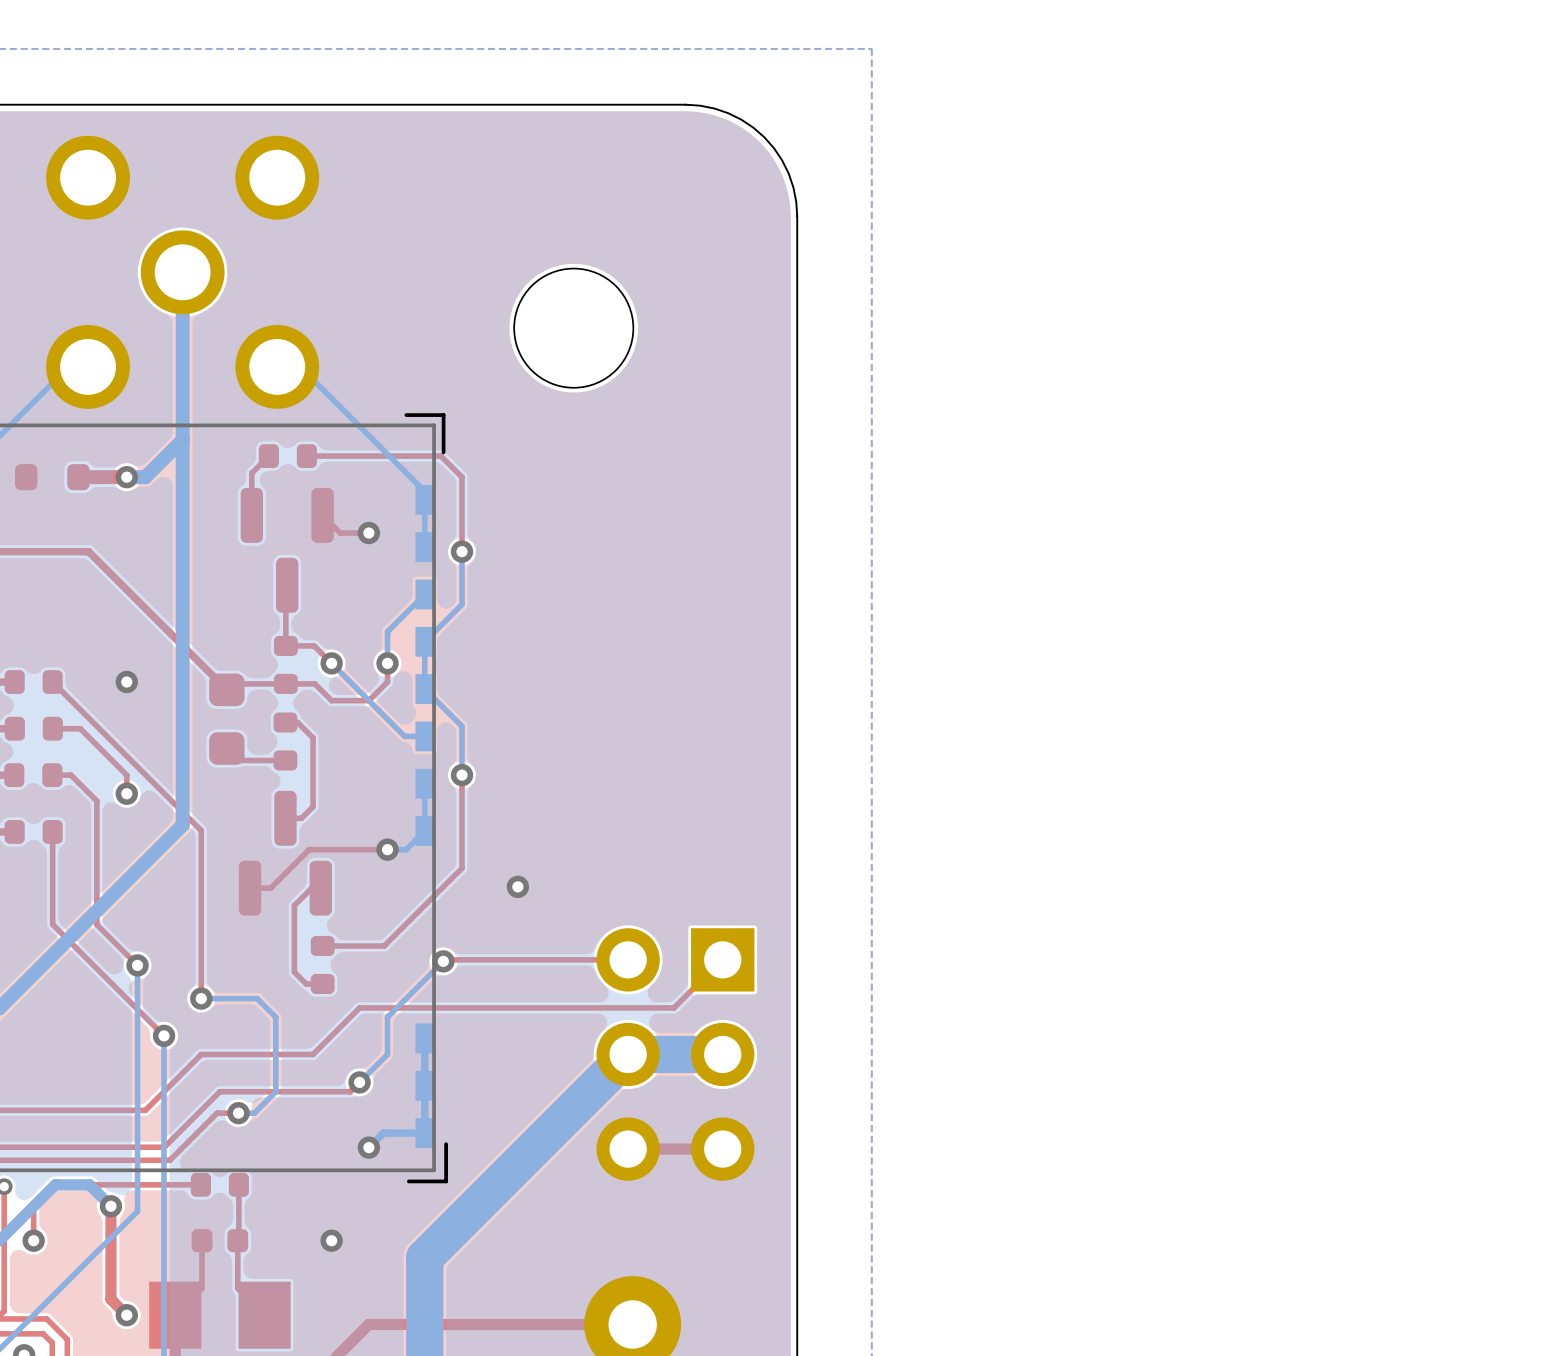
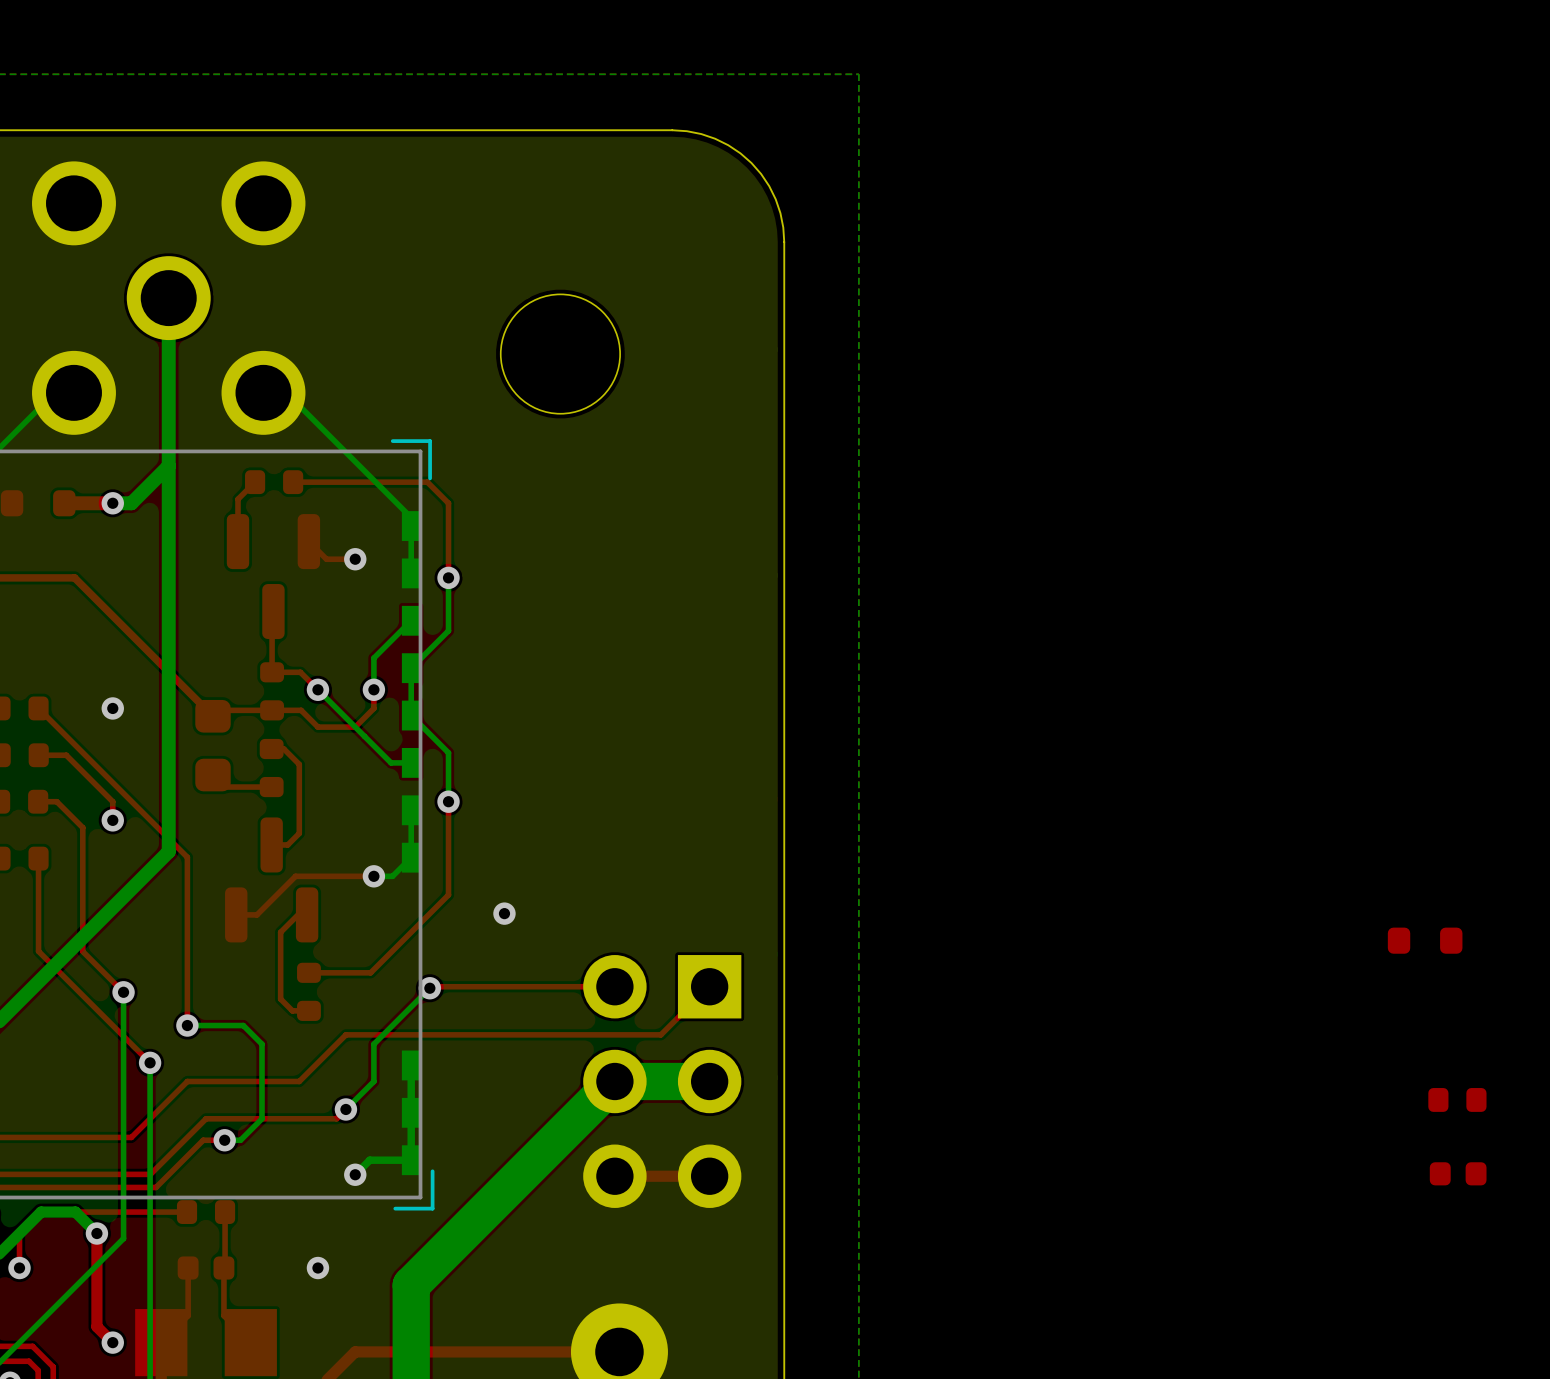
part: none -> (1425, 940)
part: none -> (1457, 1099)
part: none -> (1458, 1173)

